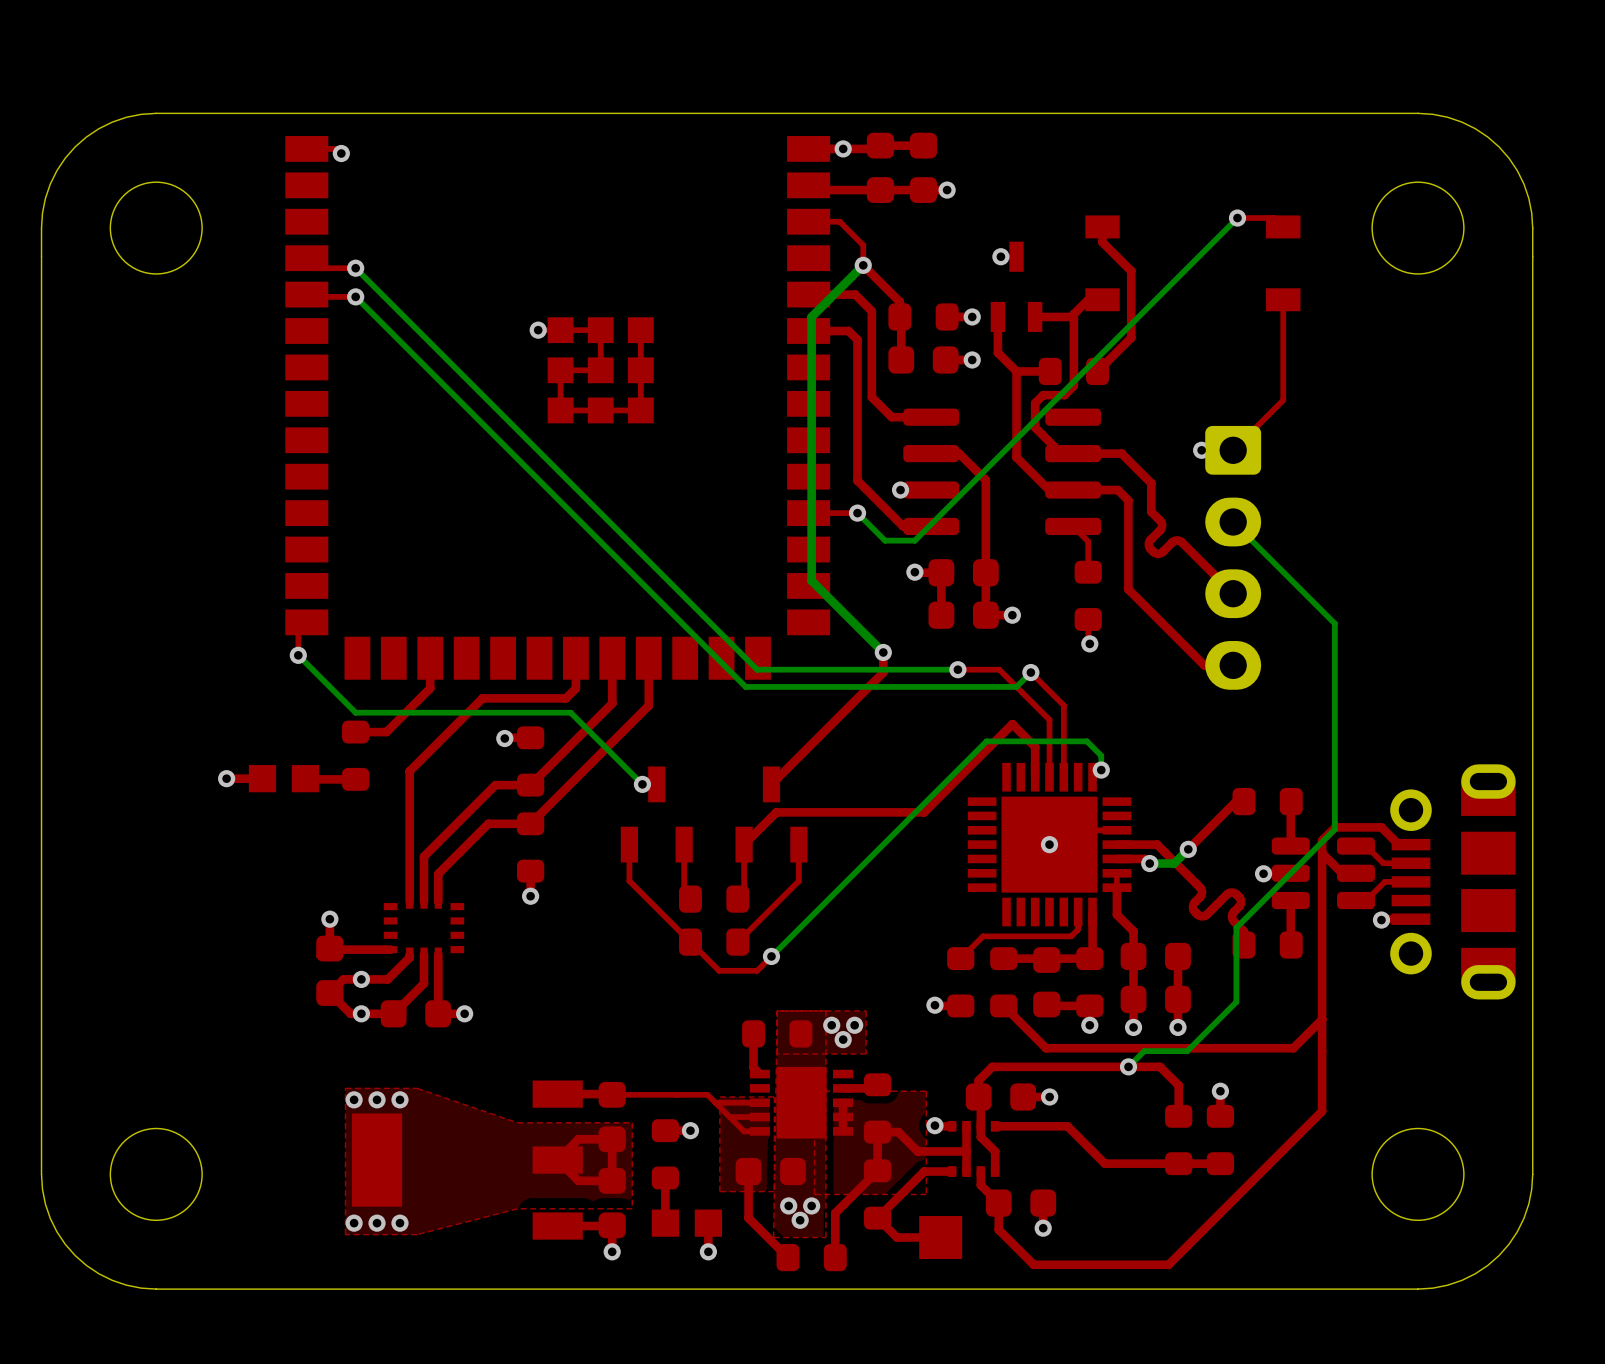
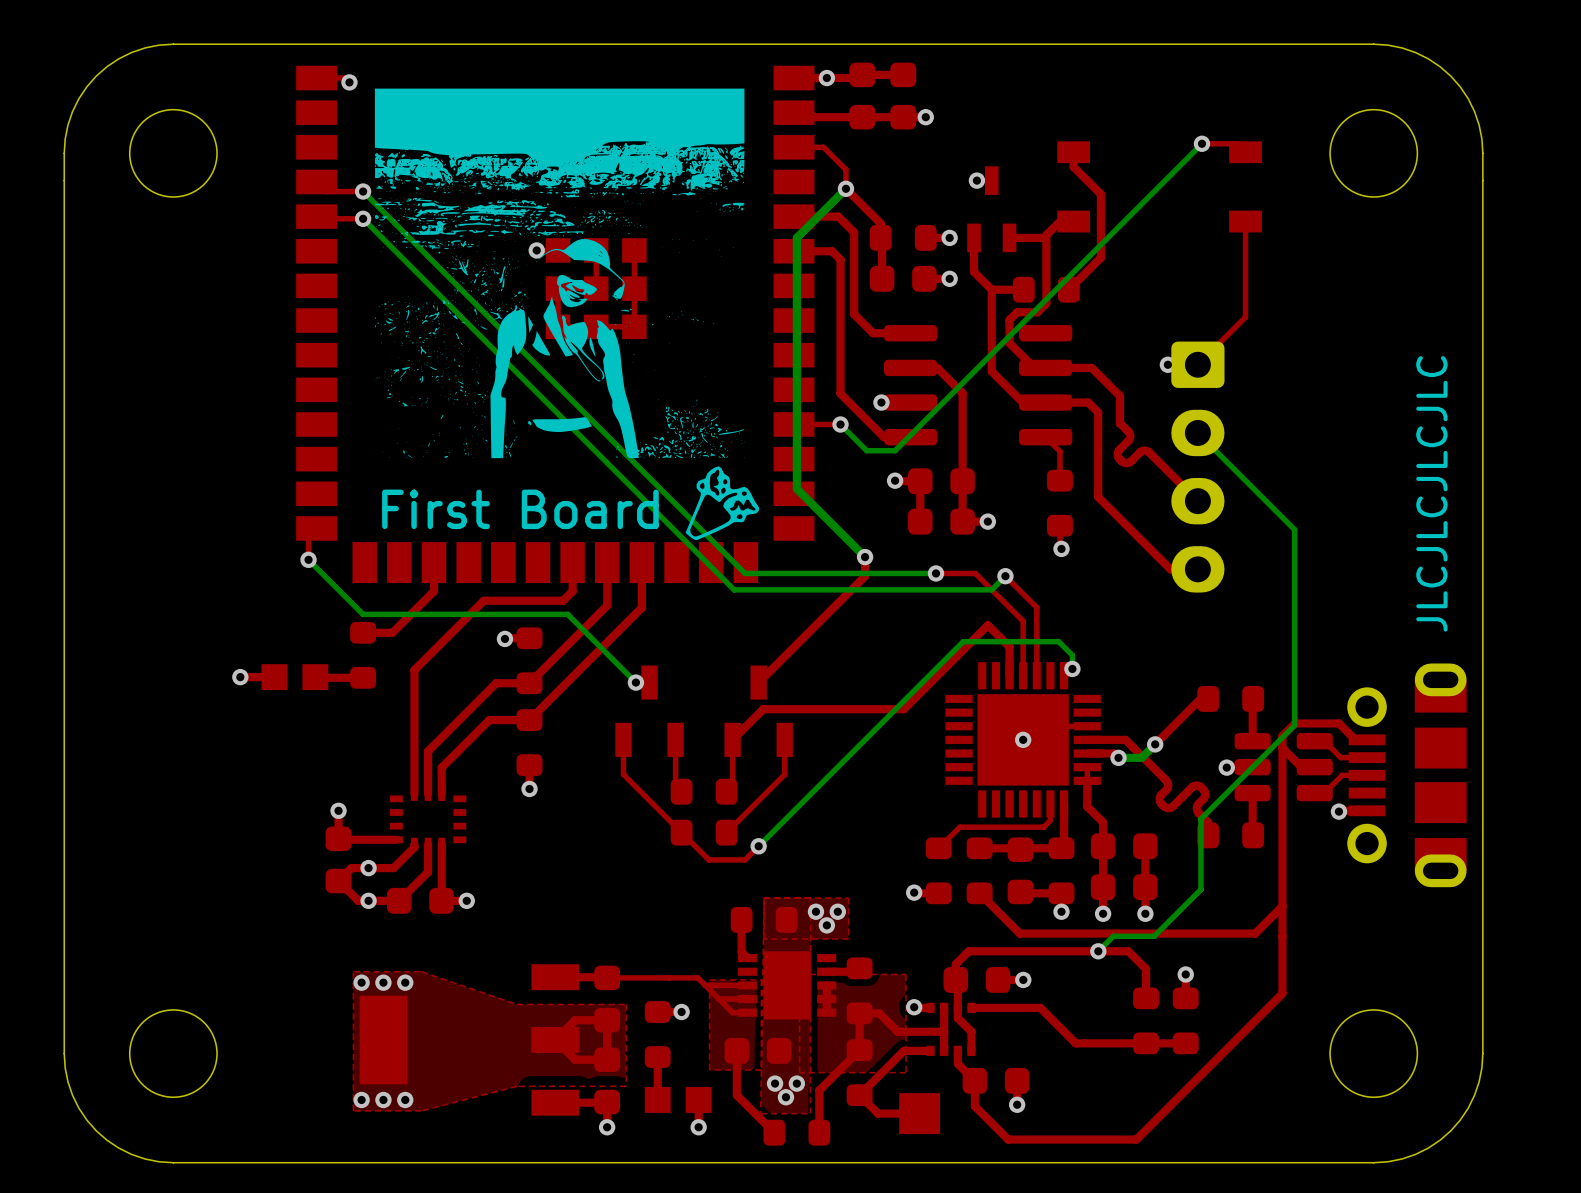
drawing: none -> [374, 88, 760, 541]
text: none -> JLCJLCJLCJLC (1431, 493)
text: none -> First Board (520, 509)

